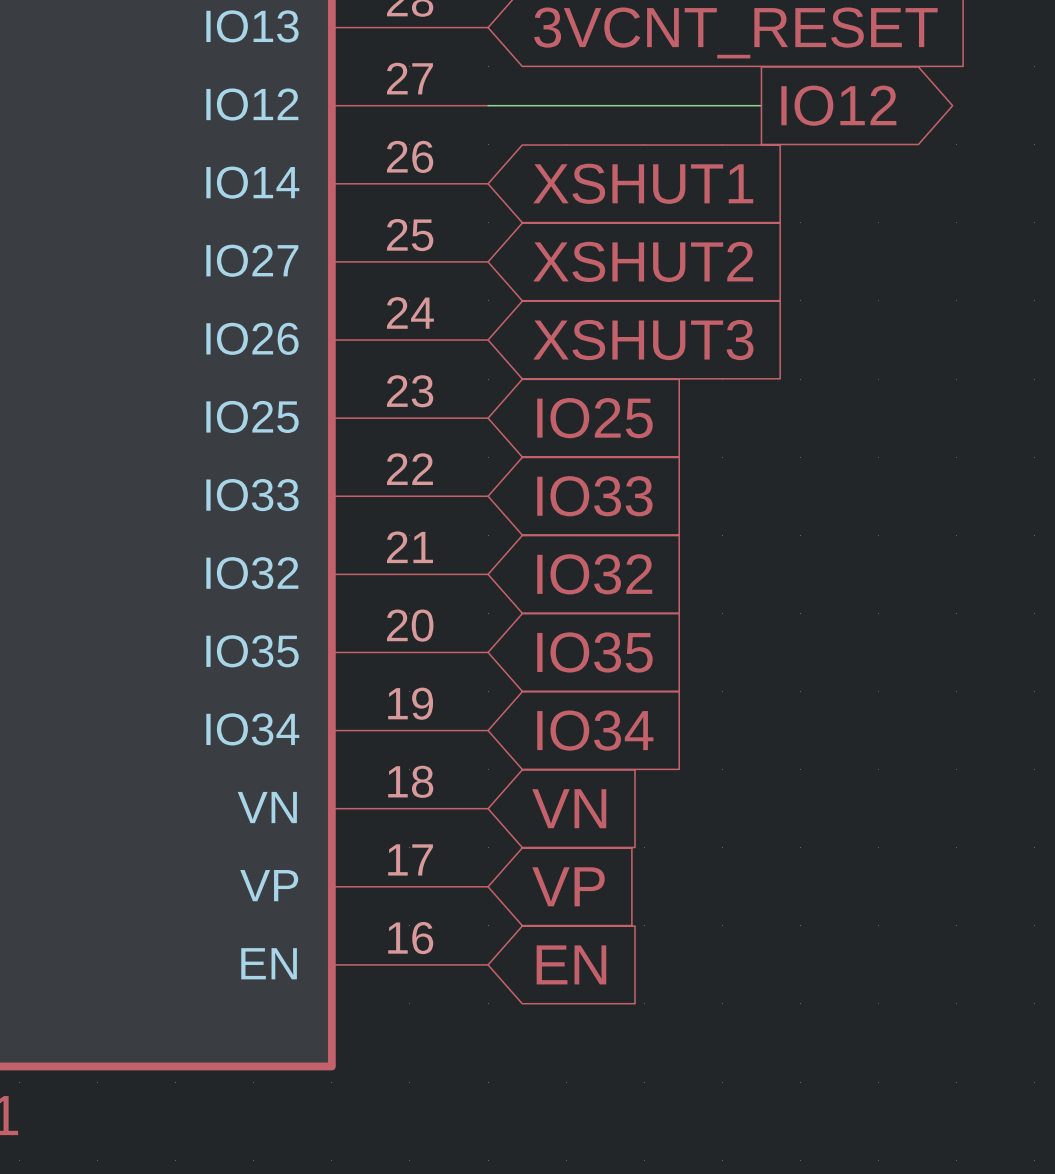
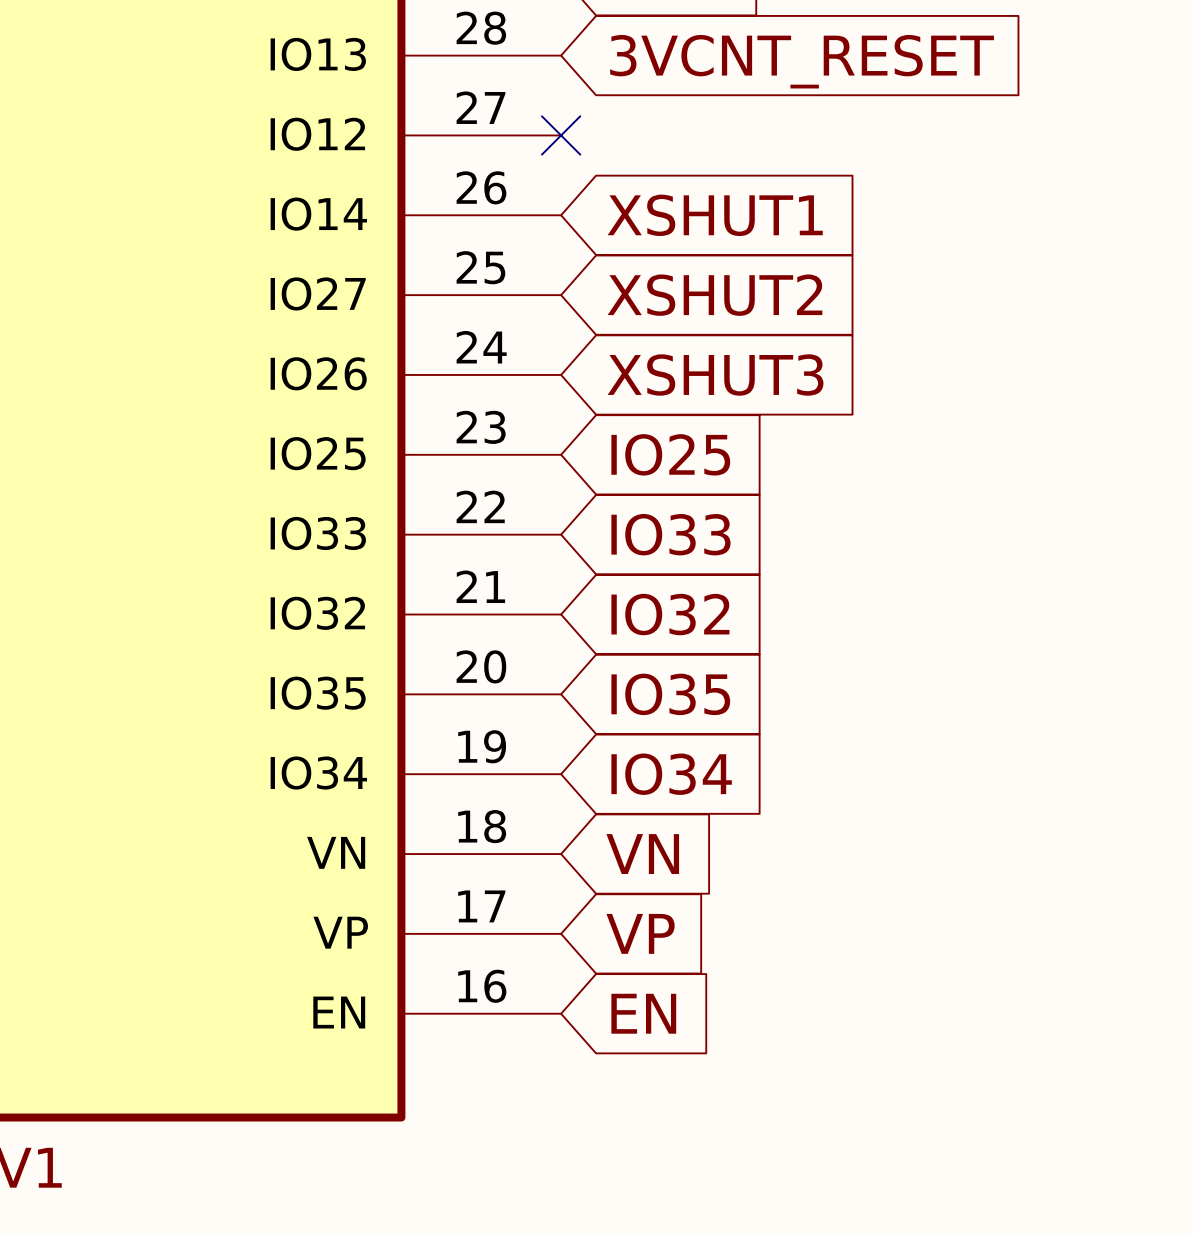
wire: (488, 105) (761, 105) -> none
no-connect mark: none -> (561, 135)
global label: IO12 (838, 105) -> none

